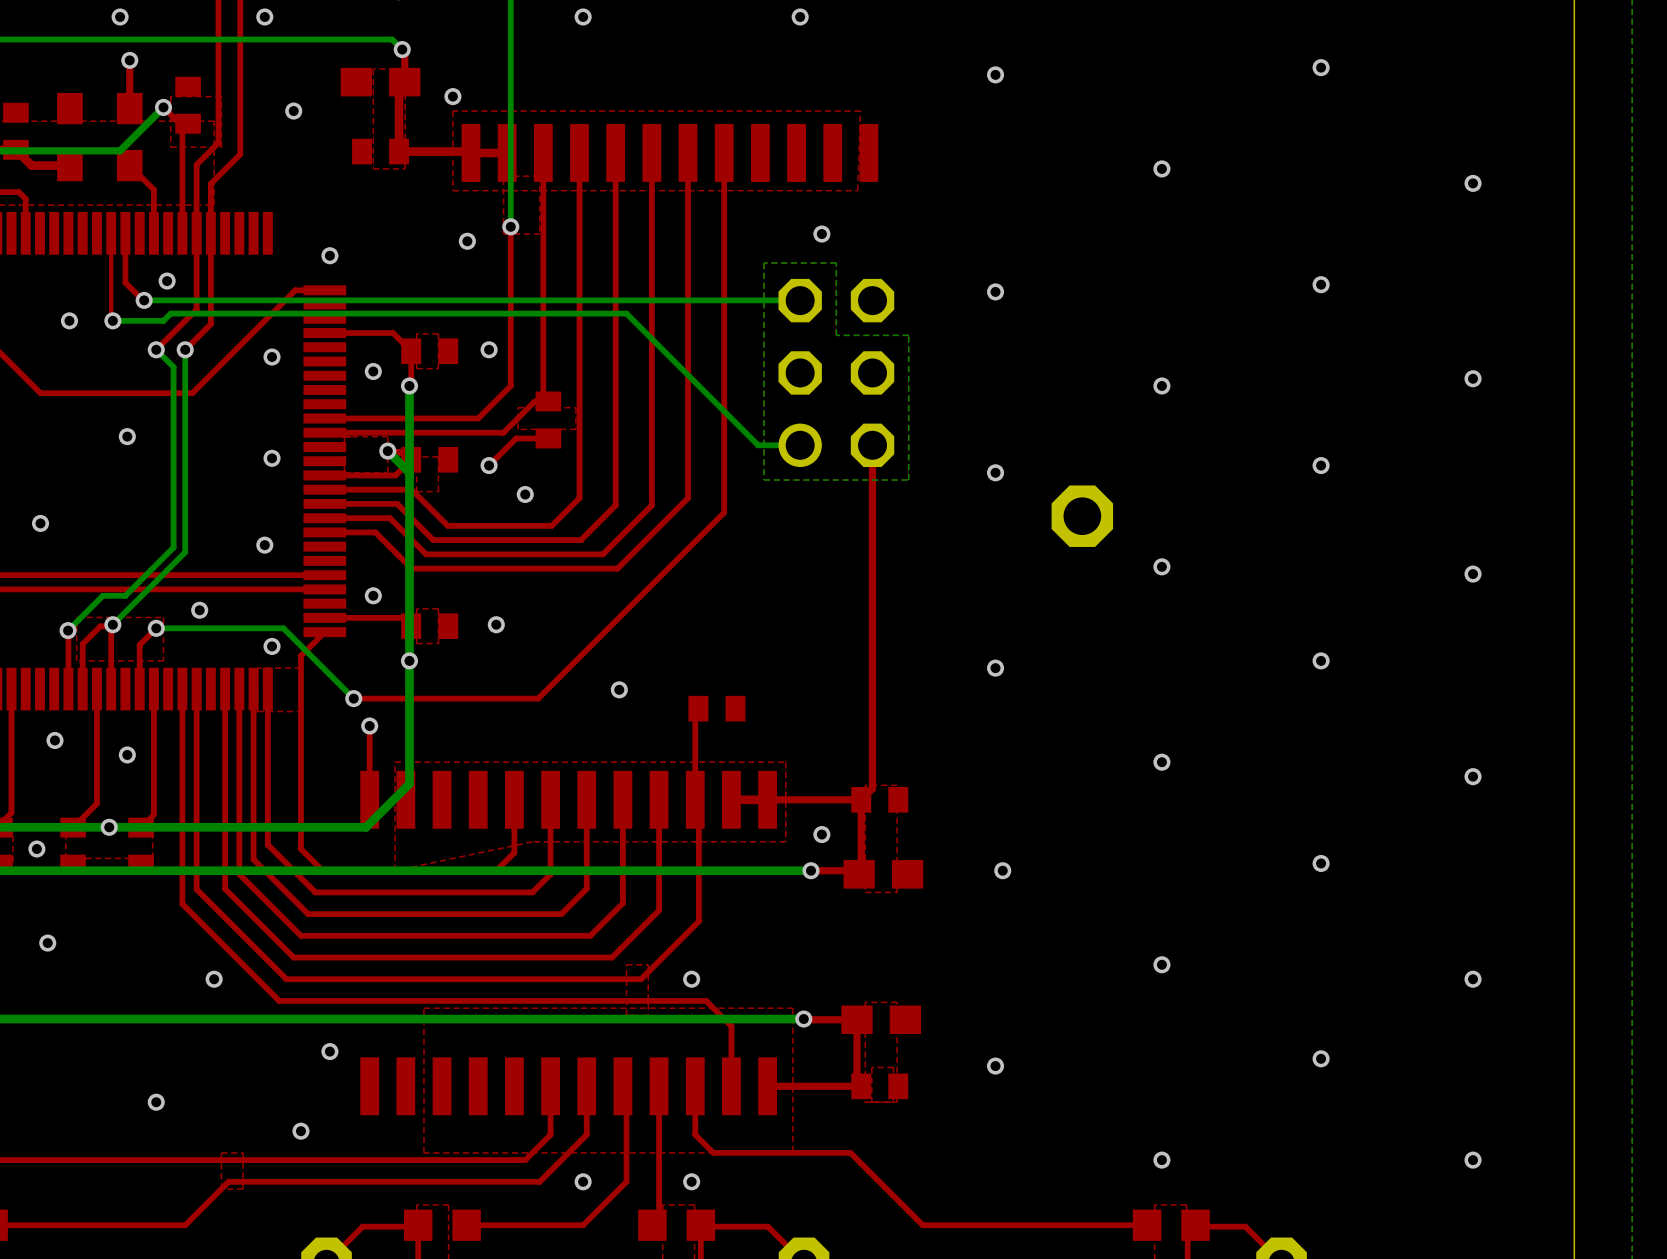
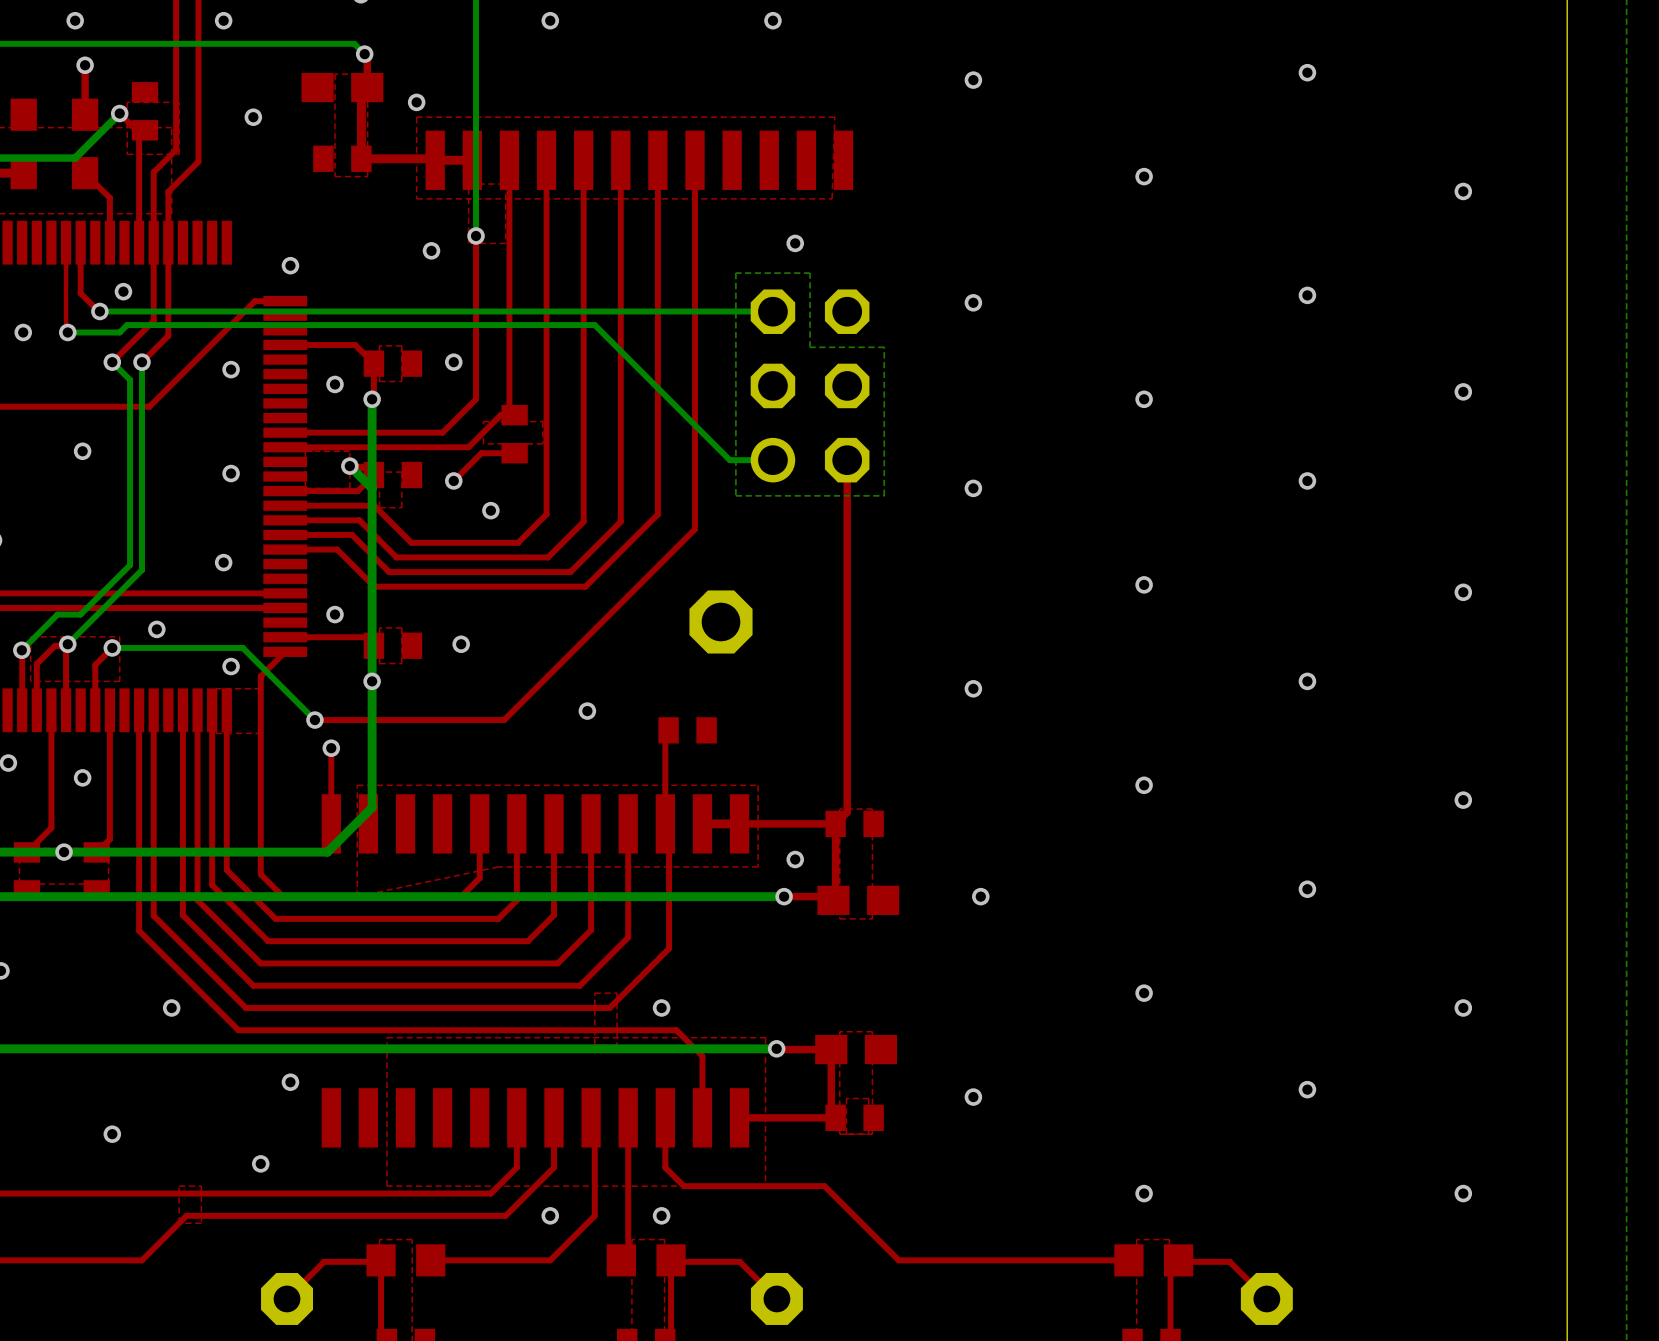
part position: (1082, 516) -> (721, 621)

